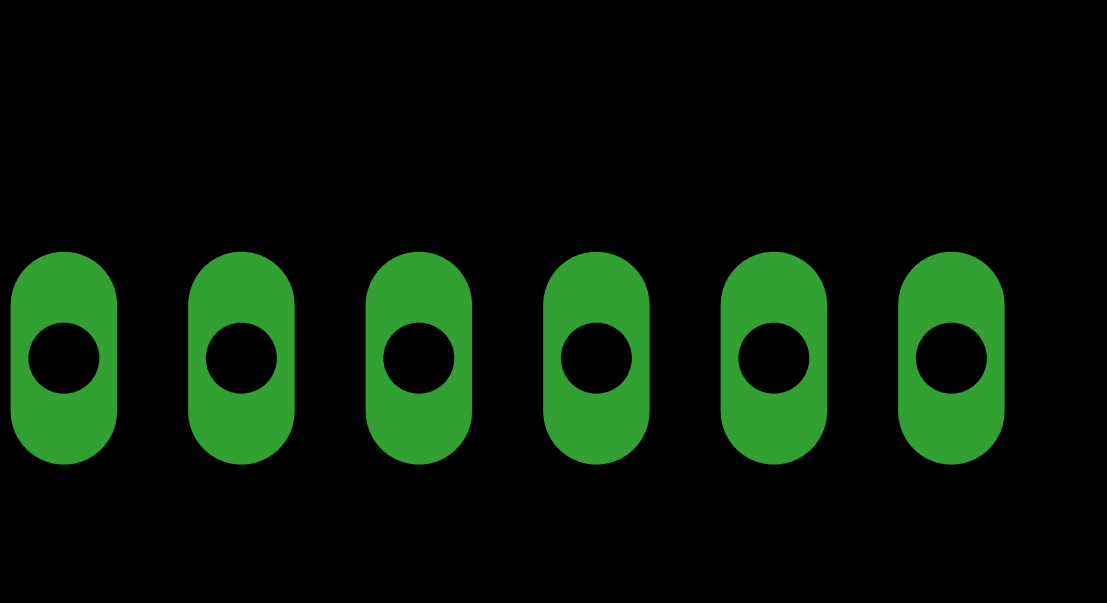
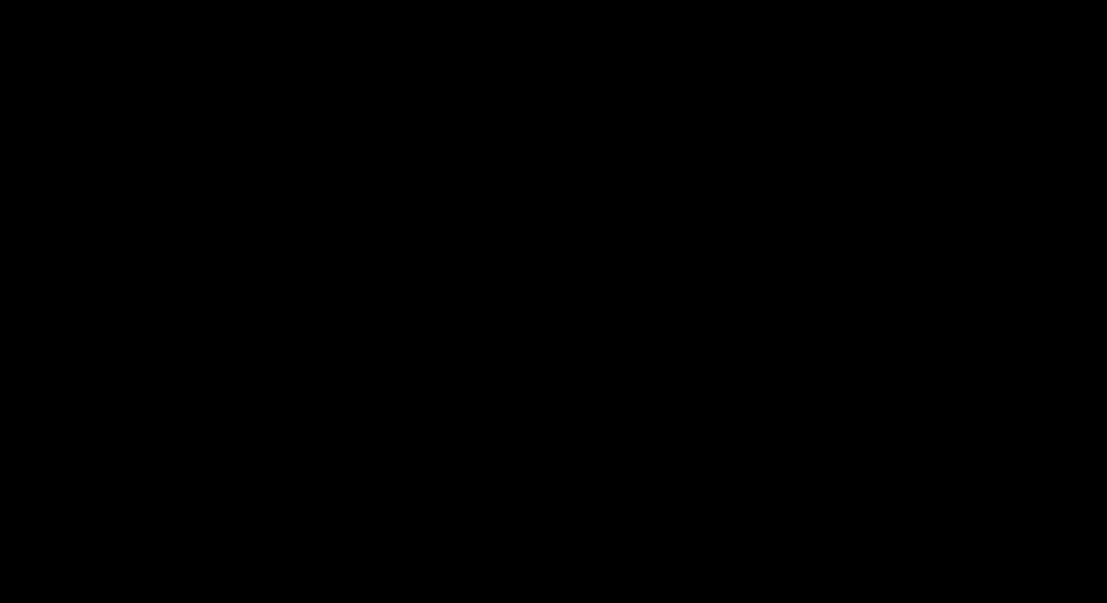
part: (507, 358) -> none

